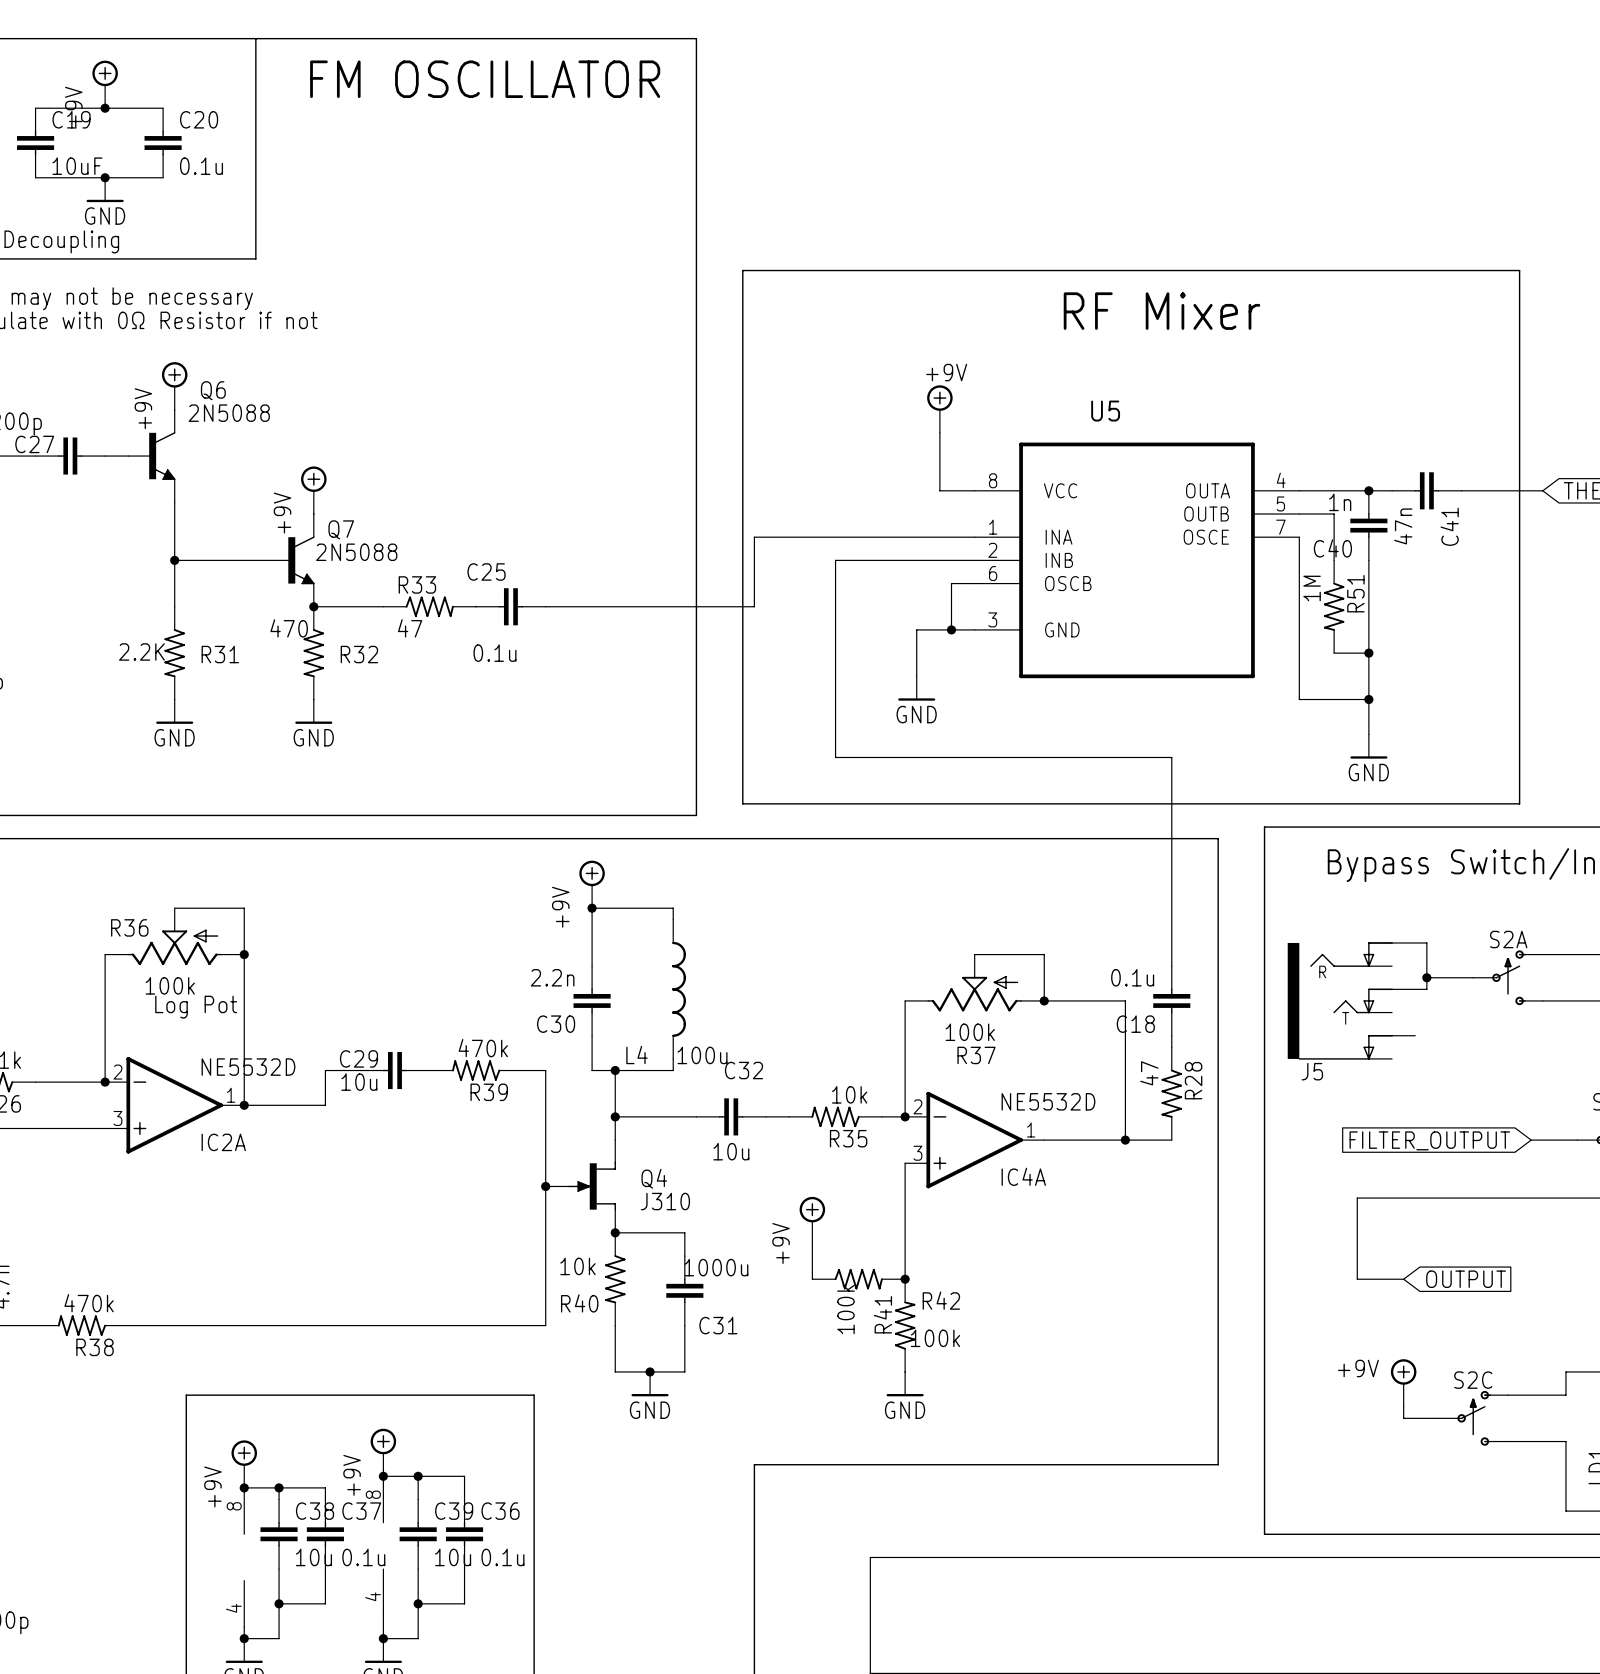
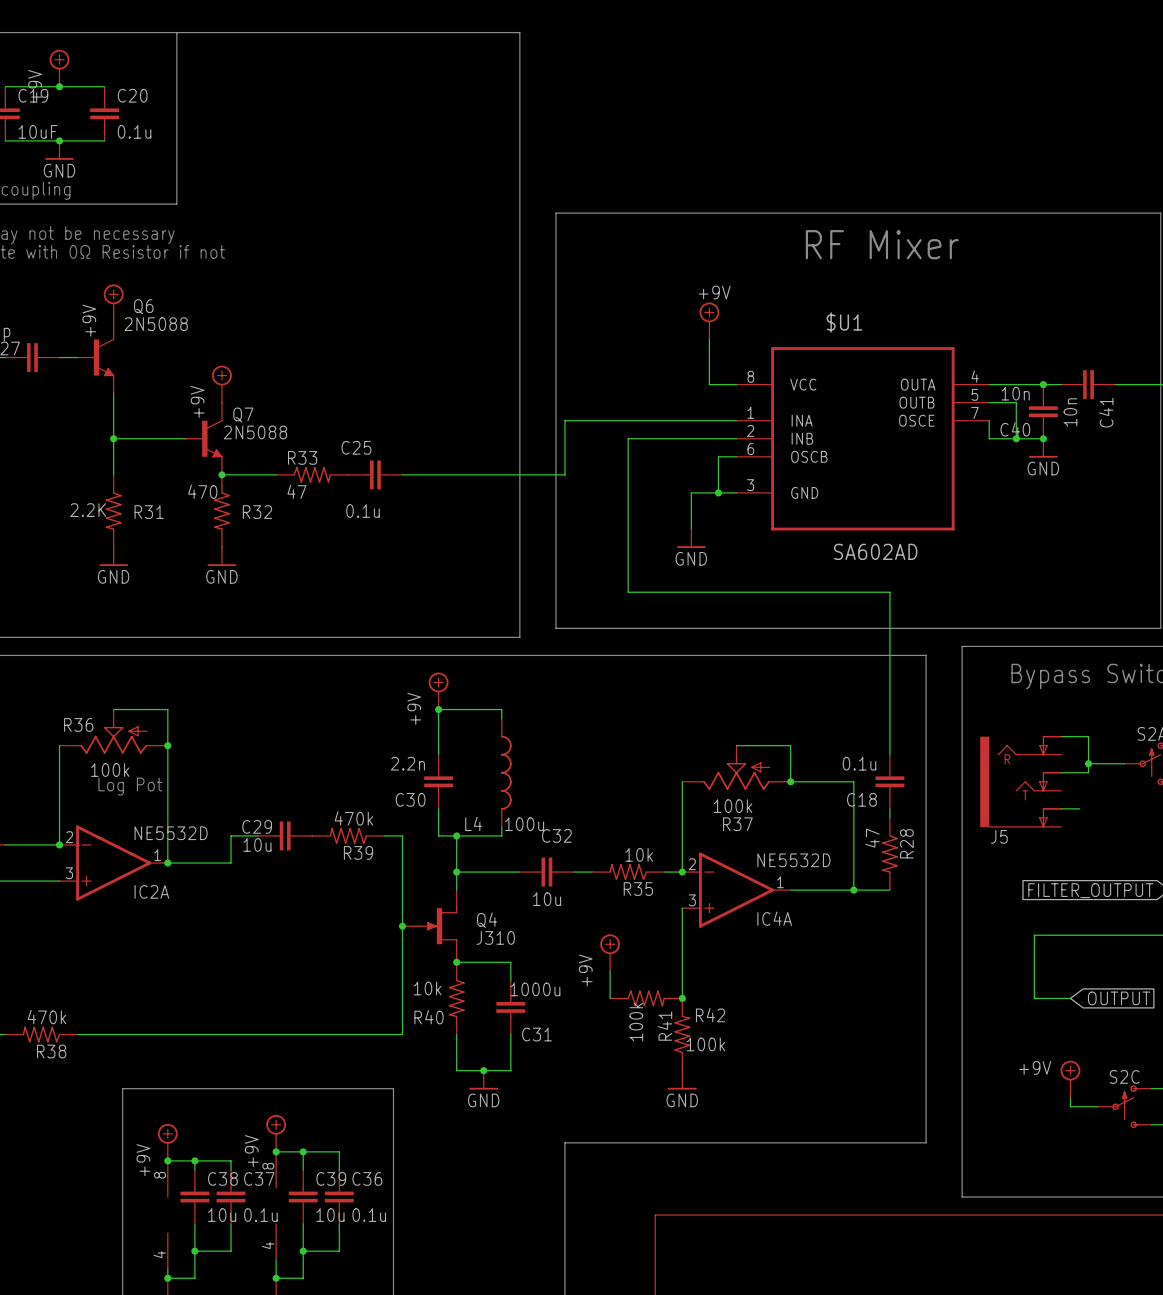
text: FM OSCILLATOR (485, 79) -> none
U5 name: U5 (1105, 411) -> $U1 (844, 322)
C40 value: 1n (1340, 502) -> 10n (1015, 393)
C41 value: 47n (1403, 526) -> 10n (1070, 412)
wire: (1299, 560) (1299, 699) (1368, 699) -> (989, 438) (1043, 438)
junction: none -> (1016, 438)
wire: (1368, 560) (1368, 734) -> none
junction: none -> (1043, 438)
R51: 1M (1334, 606) -> none
wire: (1334, 653) (1368, 653) -> none
junction: (1368, 653) -> none
junction: (1368, 699) -> none
U5 value: none -> SA602AD (875, 551)
power symbol position: GND (1368, 746) -> GND (1043, 448)

